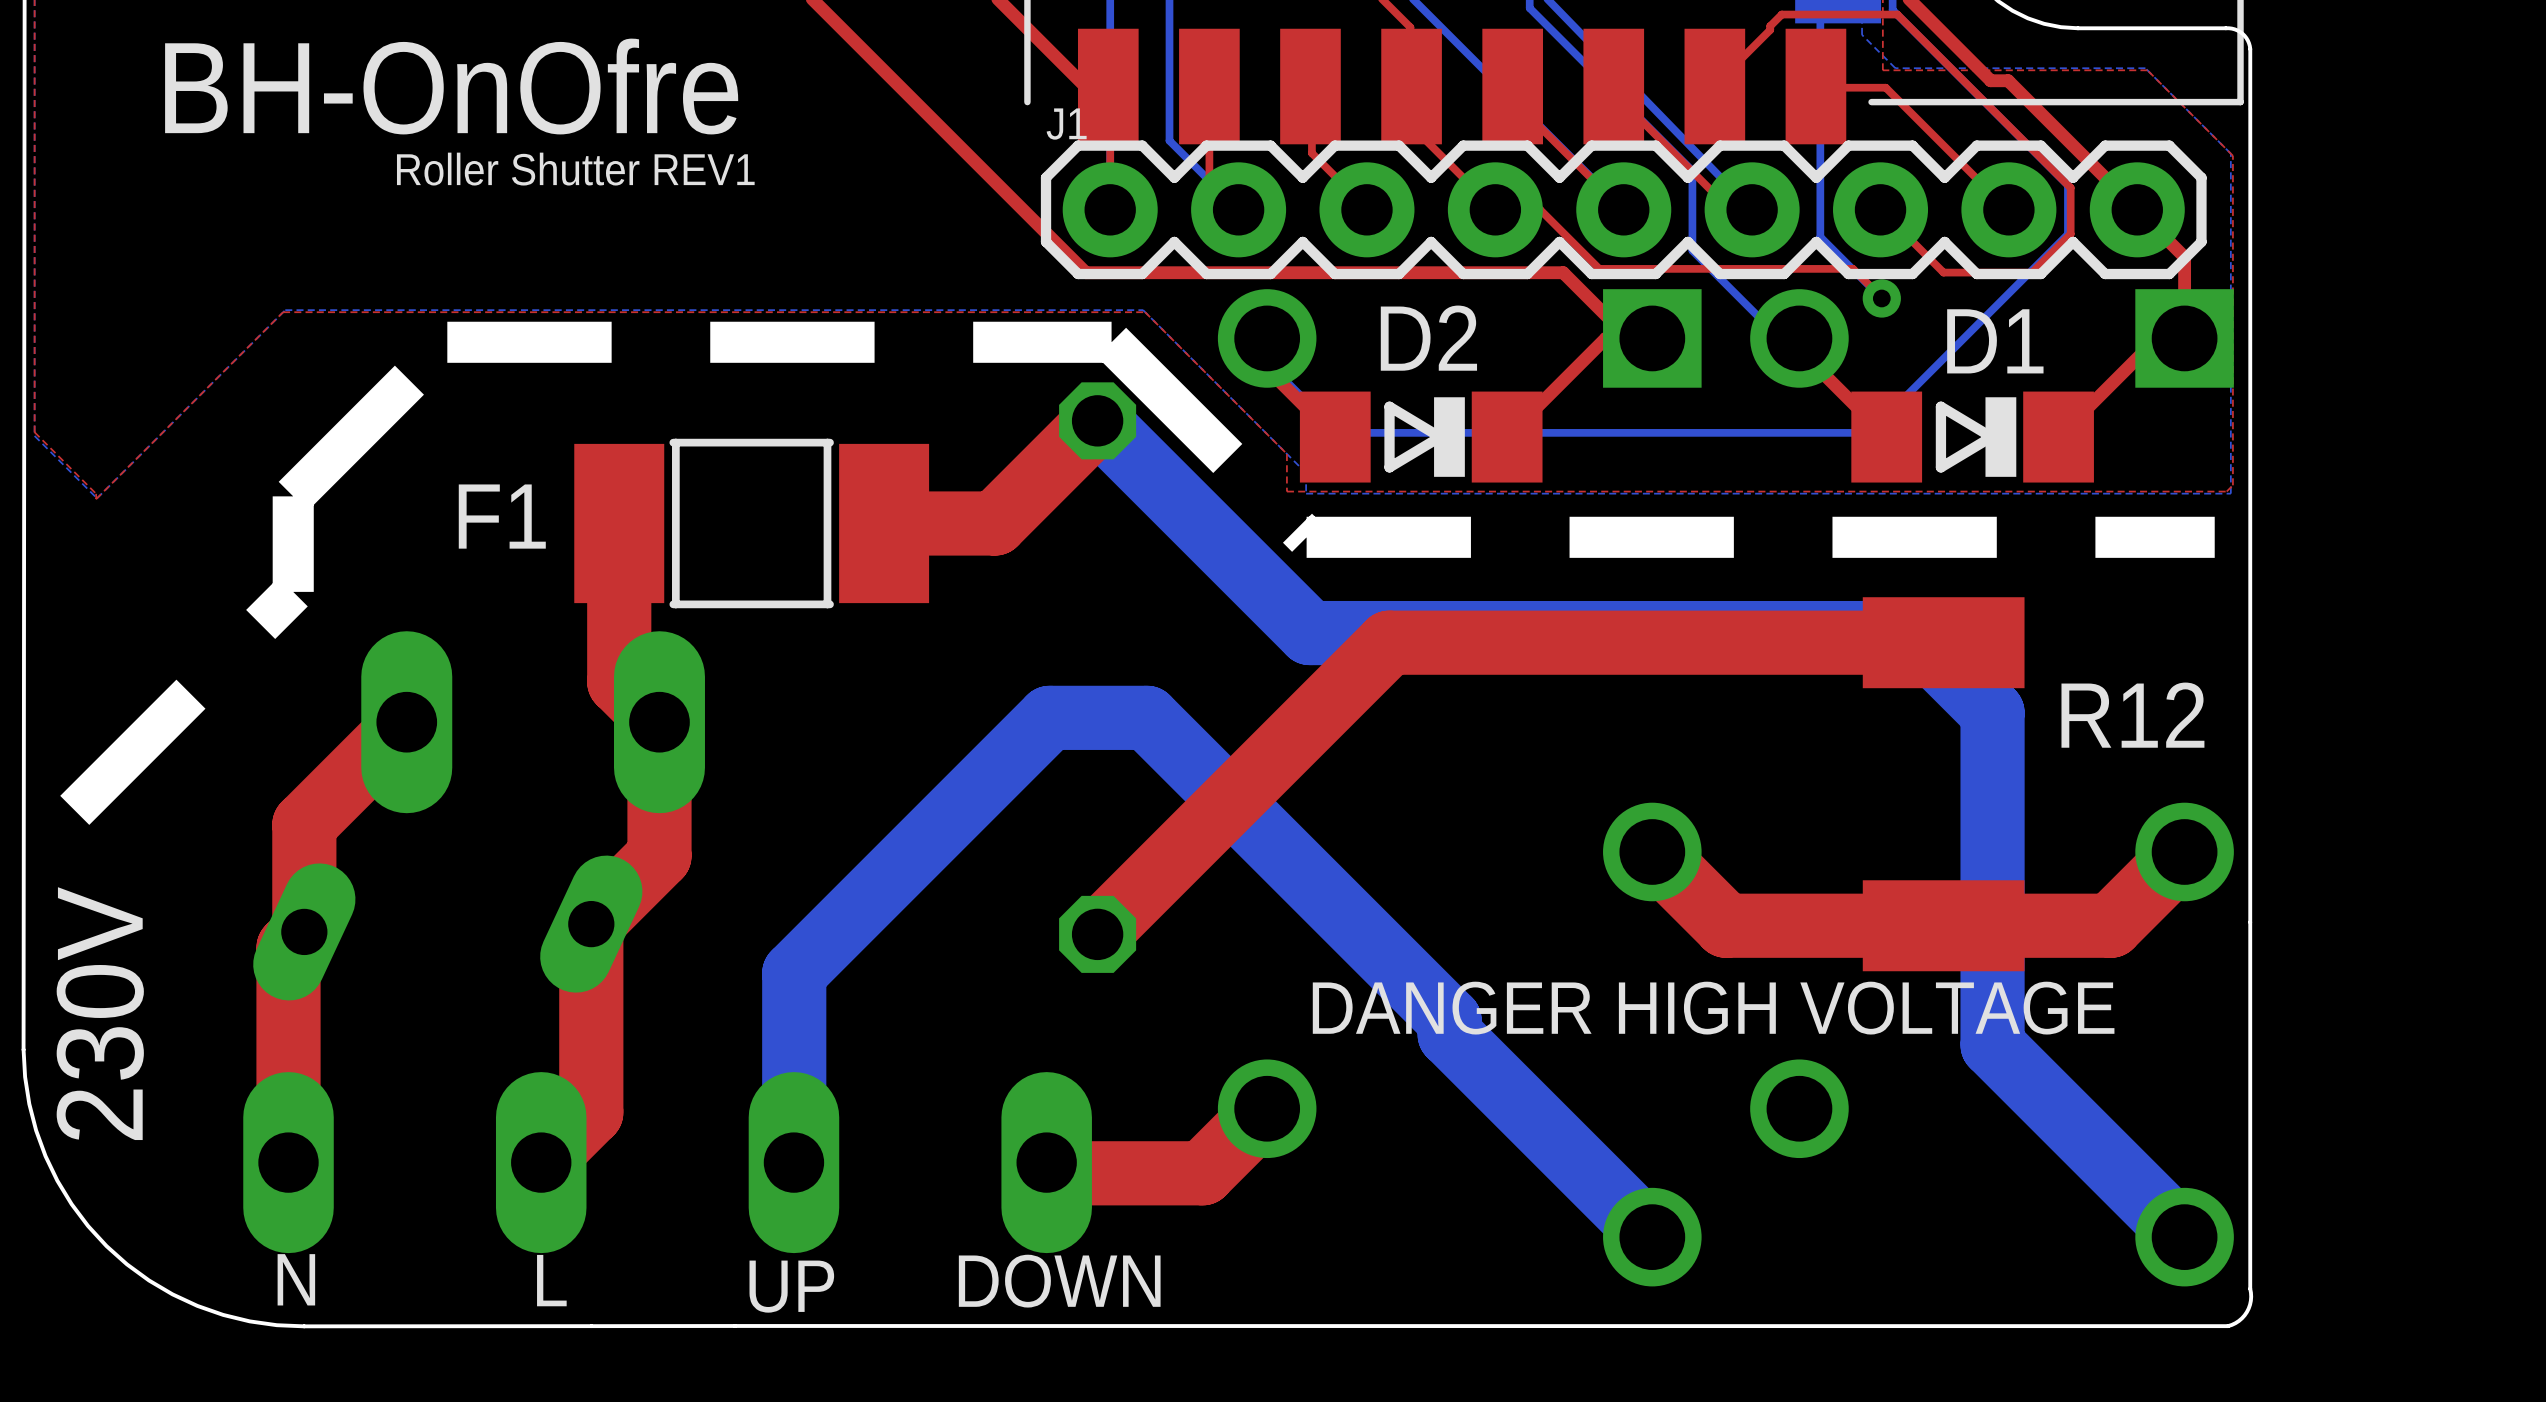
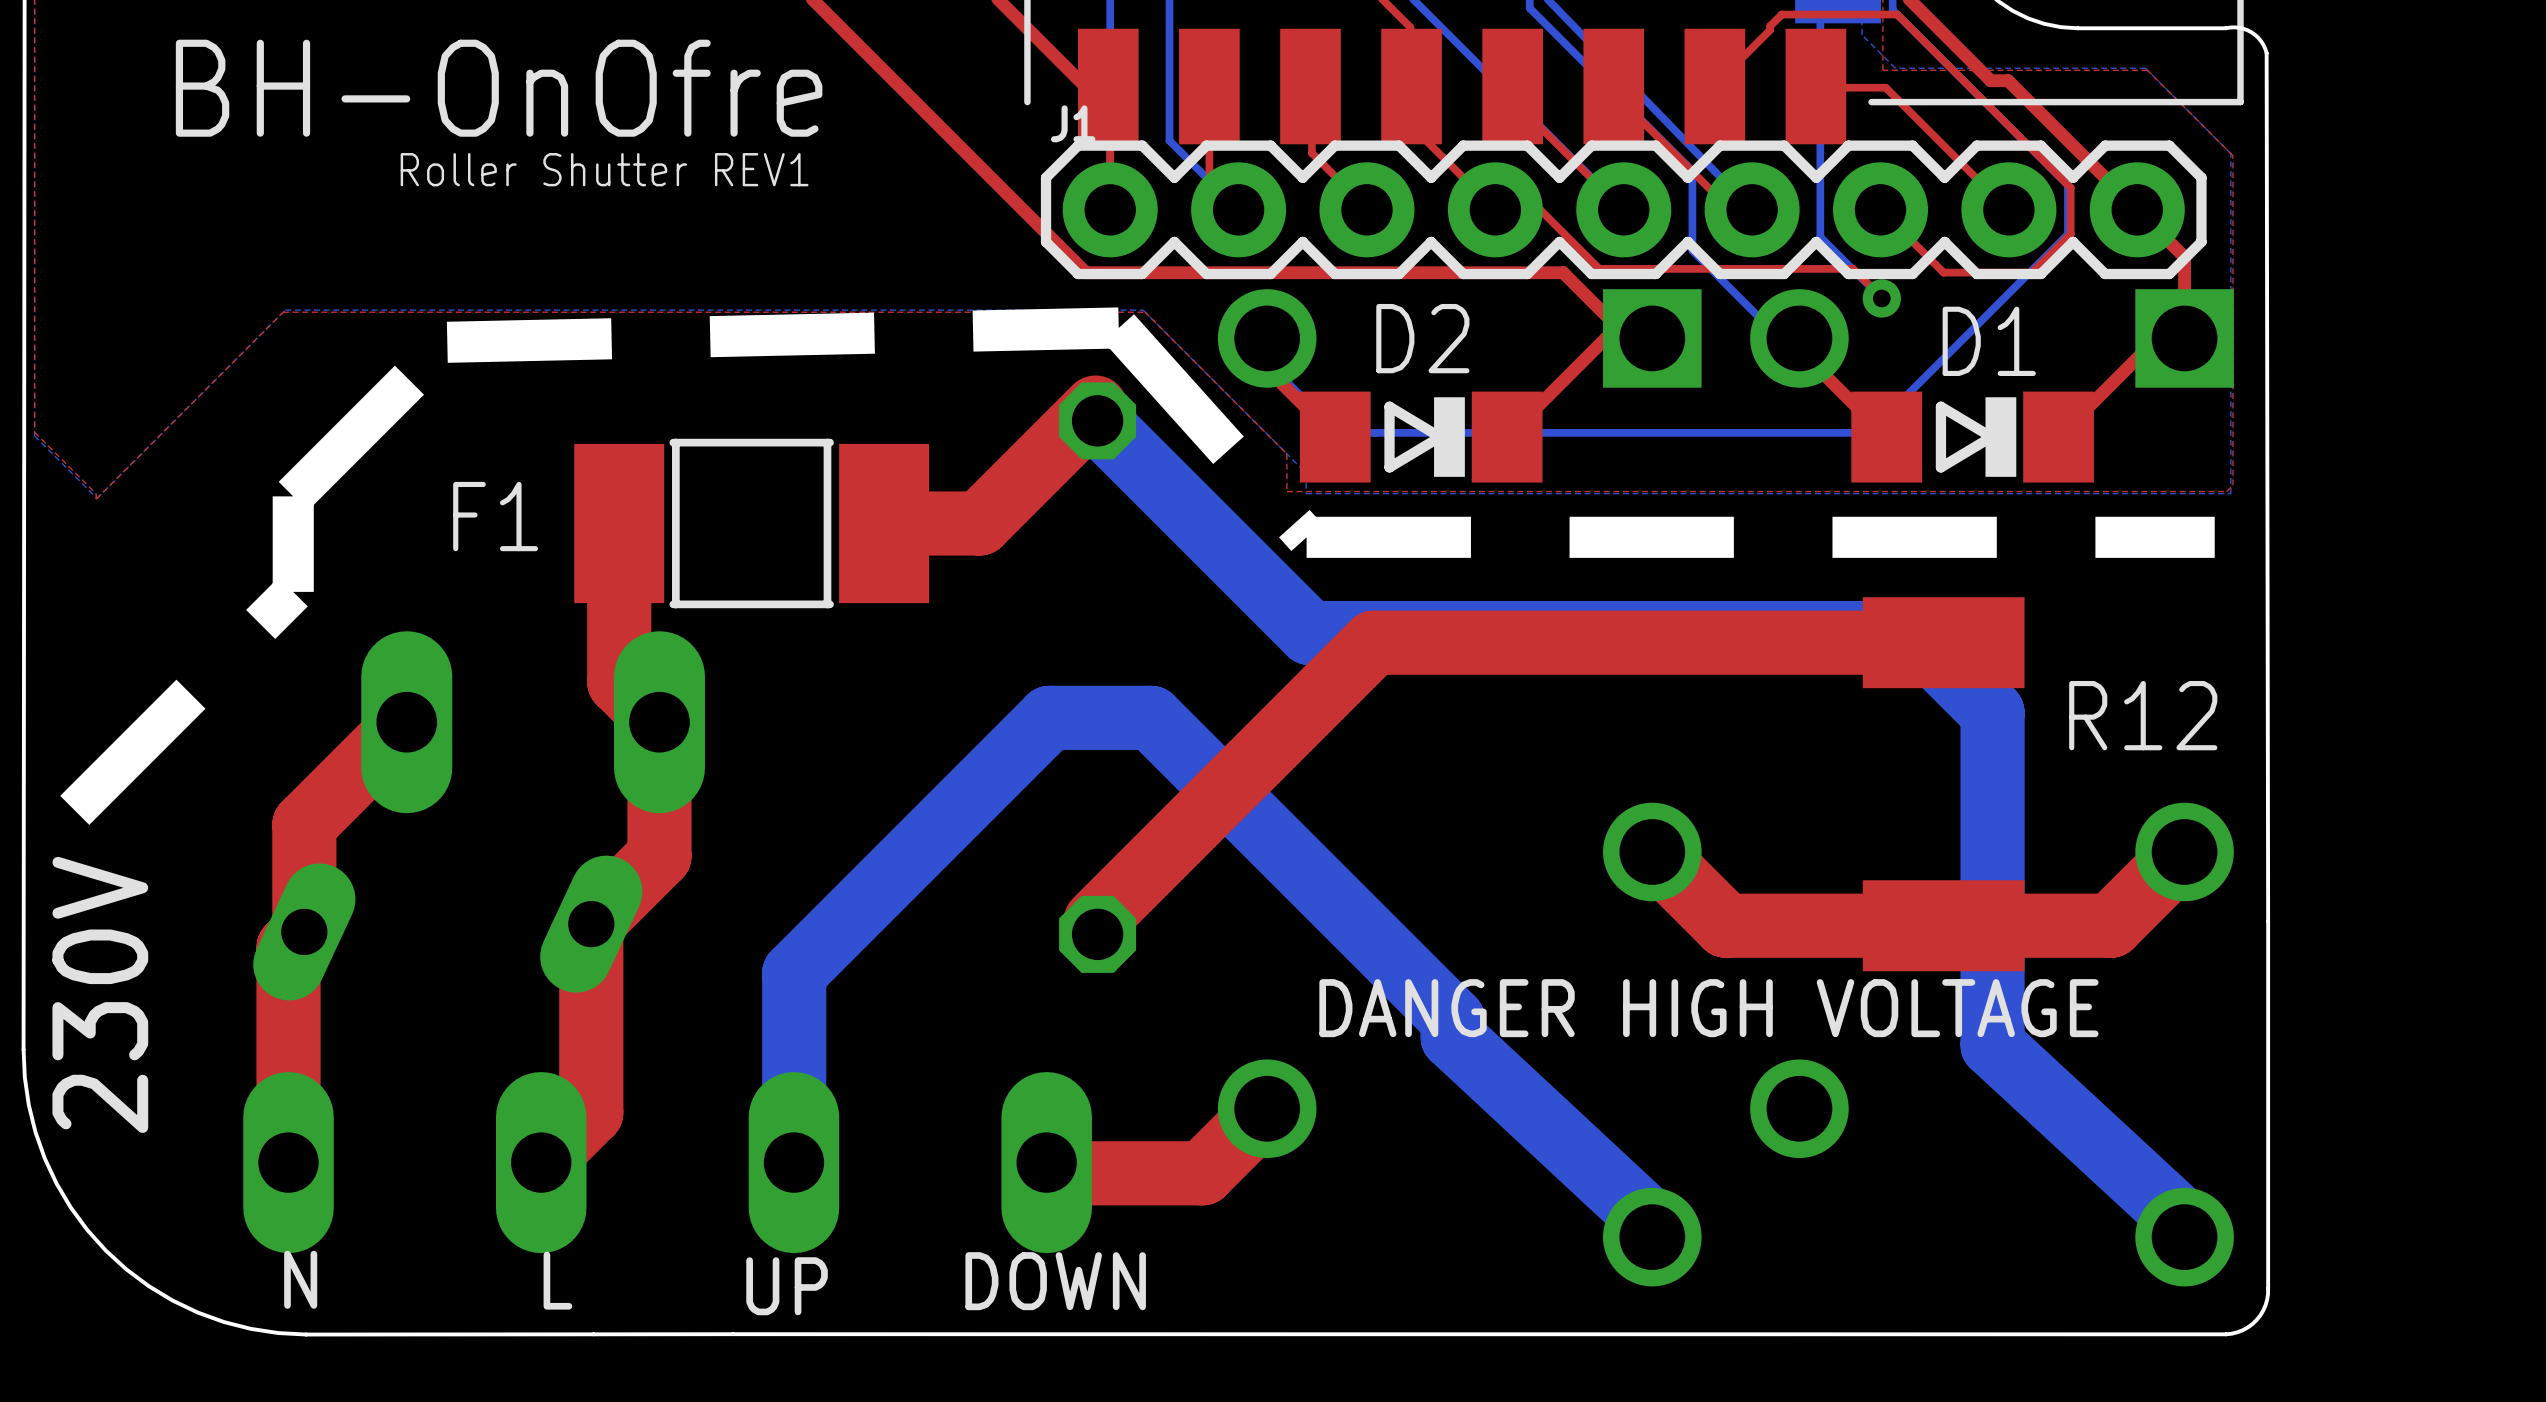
board edge: (2225, 28) (2234, 29) (2242, 33) (2247, 40) (2250, 49) (2251, 1296) (2246, 1312) (2241, 1318) (2231, 1324) (276, 1325) (223, 1314) (172, 1294) (126, 1264) (88, 1226) (57, 1180) (36, 1130) (25, 1077) (23, 1049) -> (2225, 28) (2239, 27) (2251, 32) (2261, 41) (2266, 53) (2268, 1288) (2267, 1299) (2260, 1315) (2252, 1324) (2242, 1330) (2226, 1334) (278, 1333) (223, 1322) (172, 1300) (126, 1269) (87, 1229) (56, 1183) (44, 1158) (28, 1105) (23, 1049)
board edge: (447, 342) (1111, 342) (1306, 537) -> (447, 342) (1118, 327) (1306, 537)
top track: (1097, 420) (994, 523) (979, 523) -> (1095, 407) (979, 523)
top track: (1389, 642) (1097, 934) -> (1389, 642) (1373, 642) (1095, 921)
bottom track: (1147, 717) (1449, 1020) (1449, 1034) (1652, 1237) -> (1147, 717) (1151, 717) (1452, 1019) (1452, 1037) (1667, 1237)
bottom track: (1992, 1045) (2184, 1237) -> (1992, 1045) (2200, 1237)

